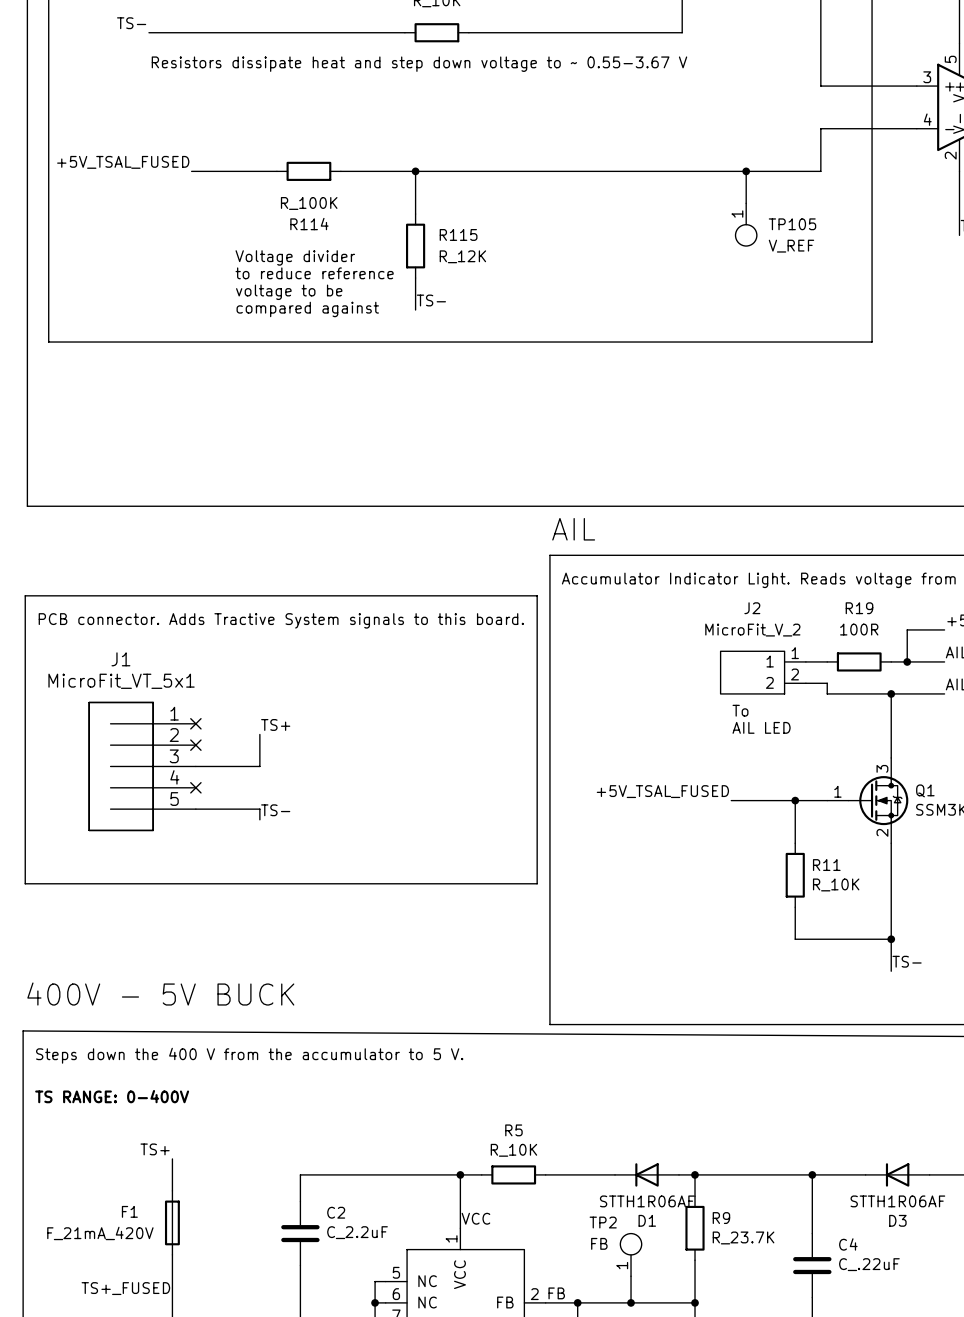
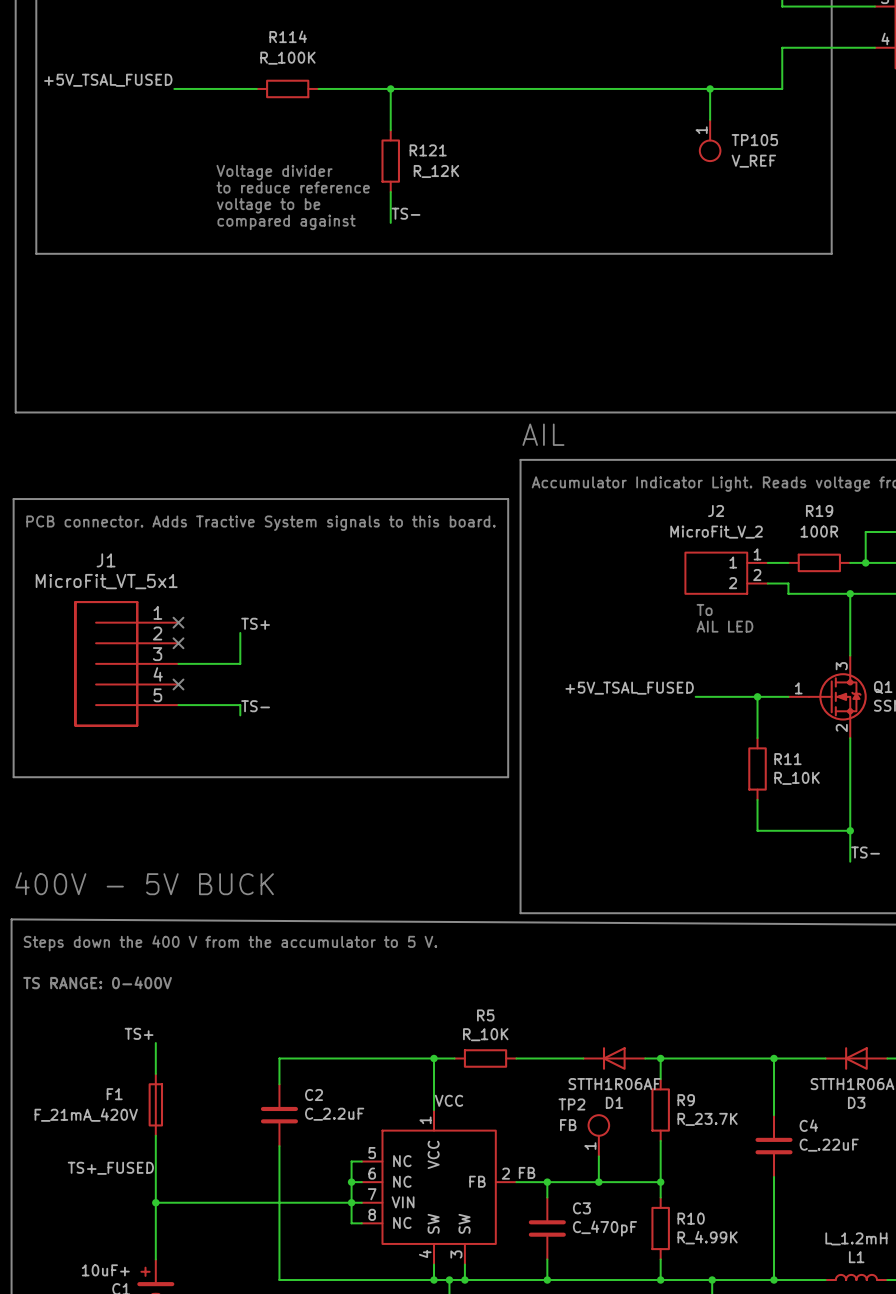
R114 value position: R_100K (309, 203) -> R_100K (287, 58)
R114 name position: R114 (309, 224) -> R114 (288, 36)
R115 name: R115 (458, 234) -> R121 (428, 150)

